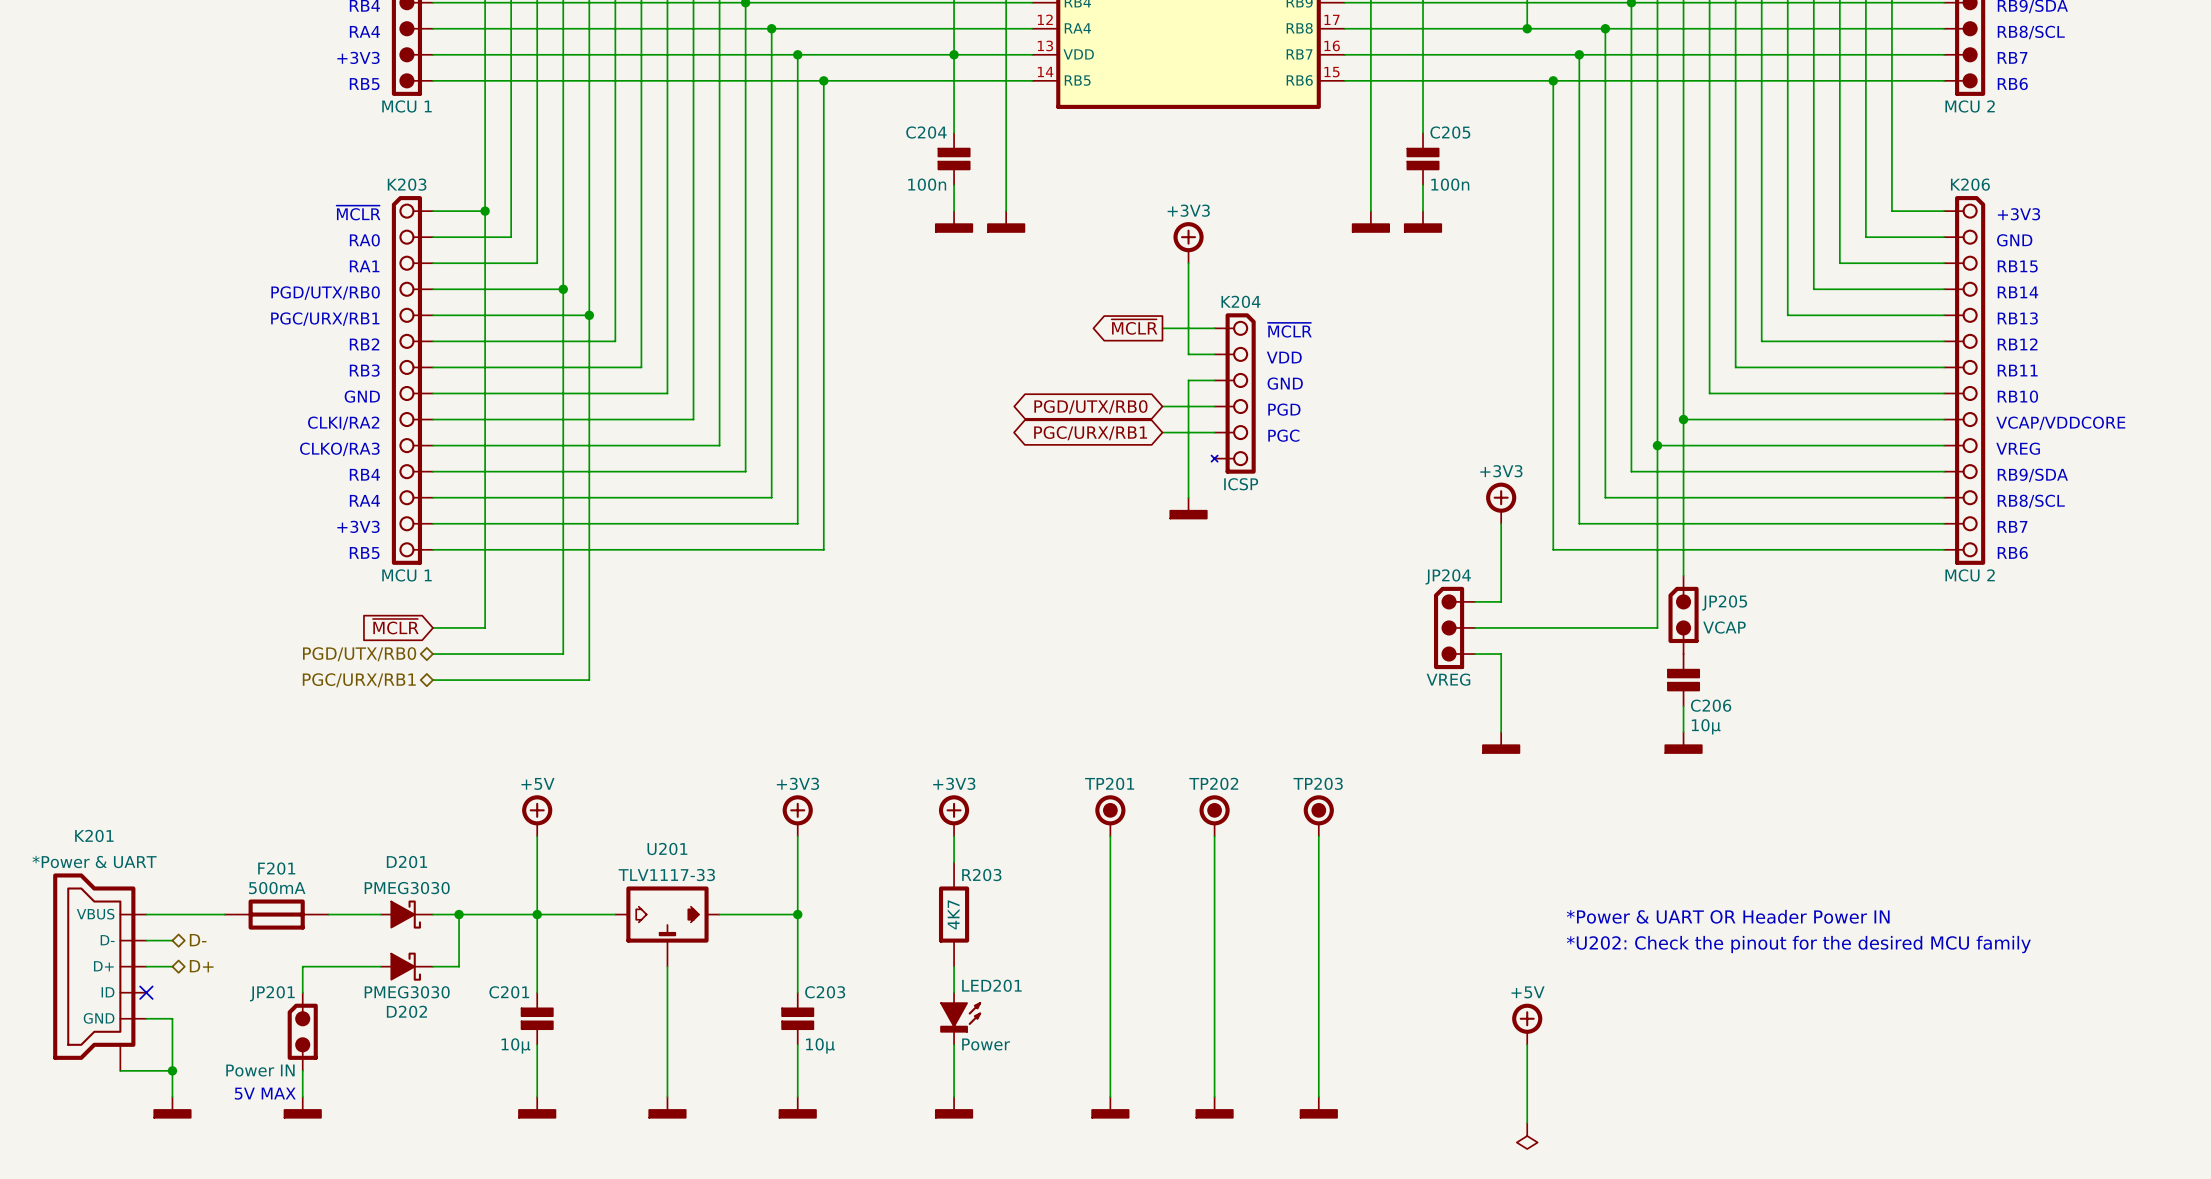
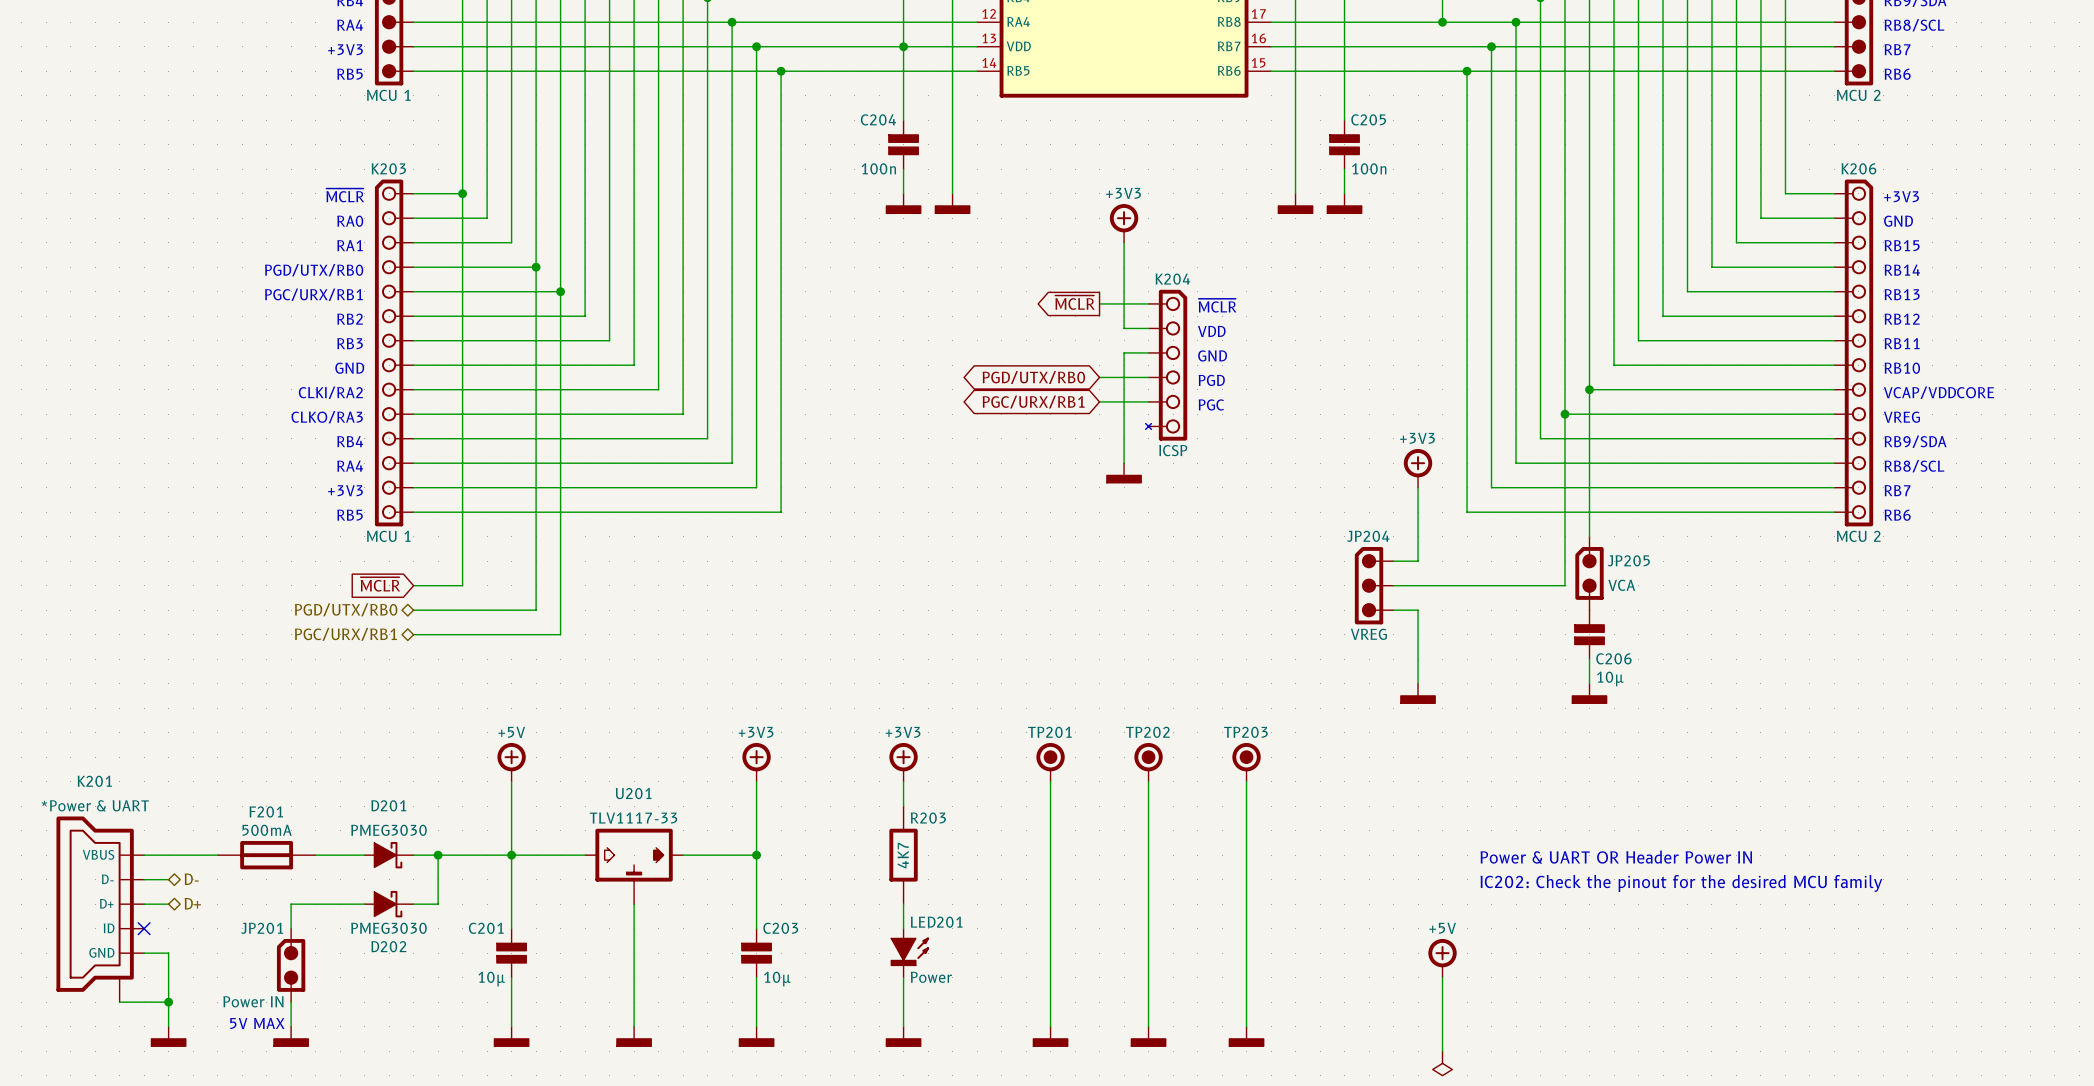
JP205 value: VCAP (1724, 627) -> VCA (1621, 585)
text: *Power & UART OR Header Power IN (1728, 916) -> Power & UART OR Header Power IN (1616, 857)
text: *U202: Check the pinout for the desired MCU family (1798, 944) -> IC202: Check the pinout for the desired MCU family (1681, 883)

